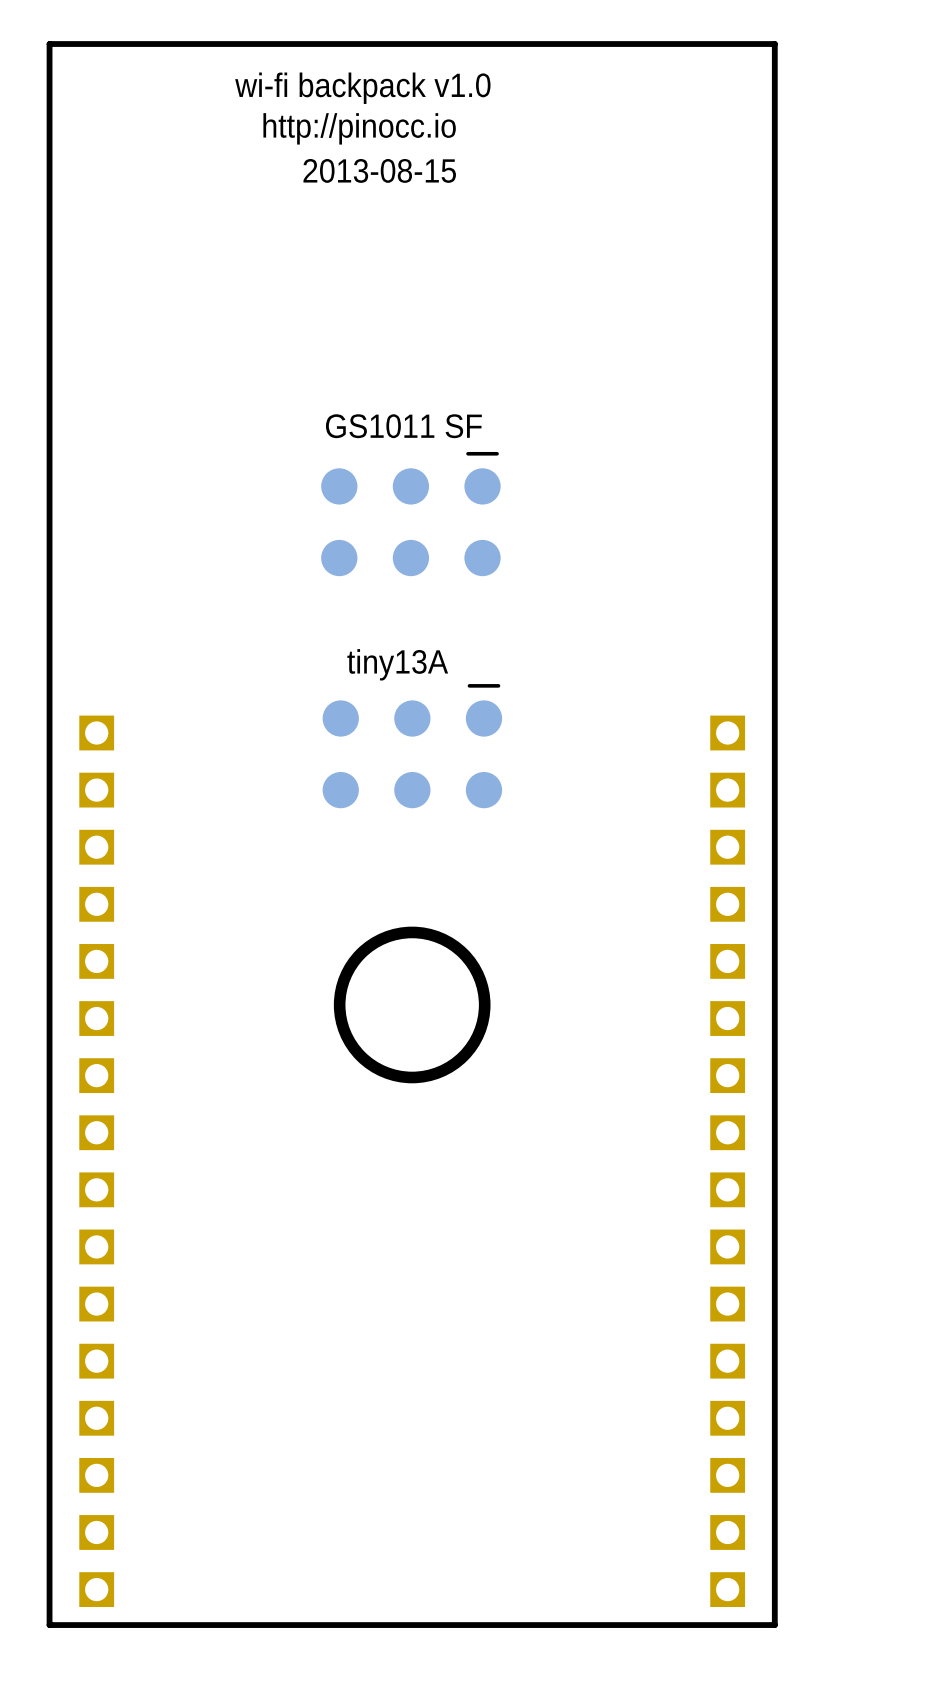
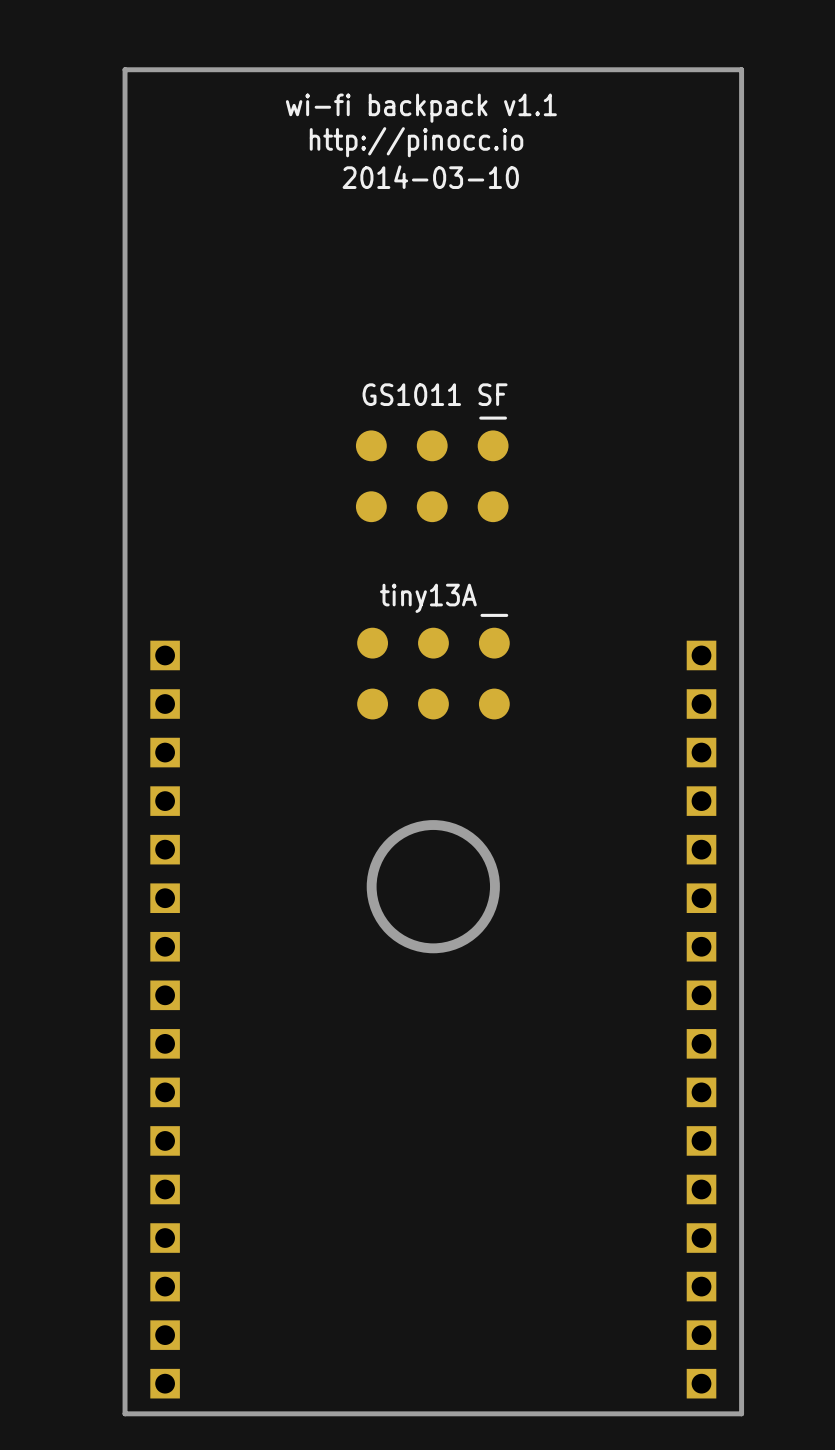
text: wi-fi backpack v1.0 (362, 88) -> wi-fi backpack v1.1 (421, 108)
text: 2013-08-15 (379, 170) -> 2014-03-10 (430, 177)

